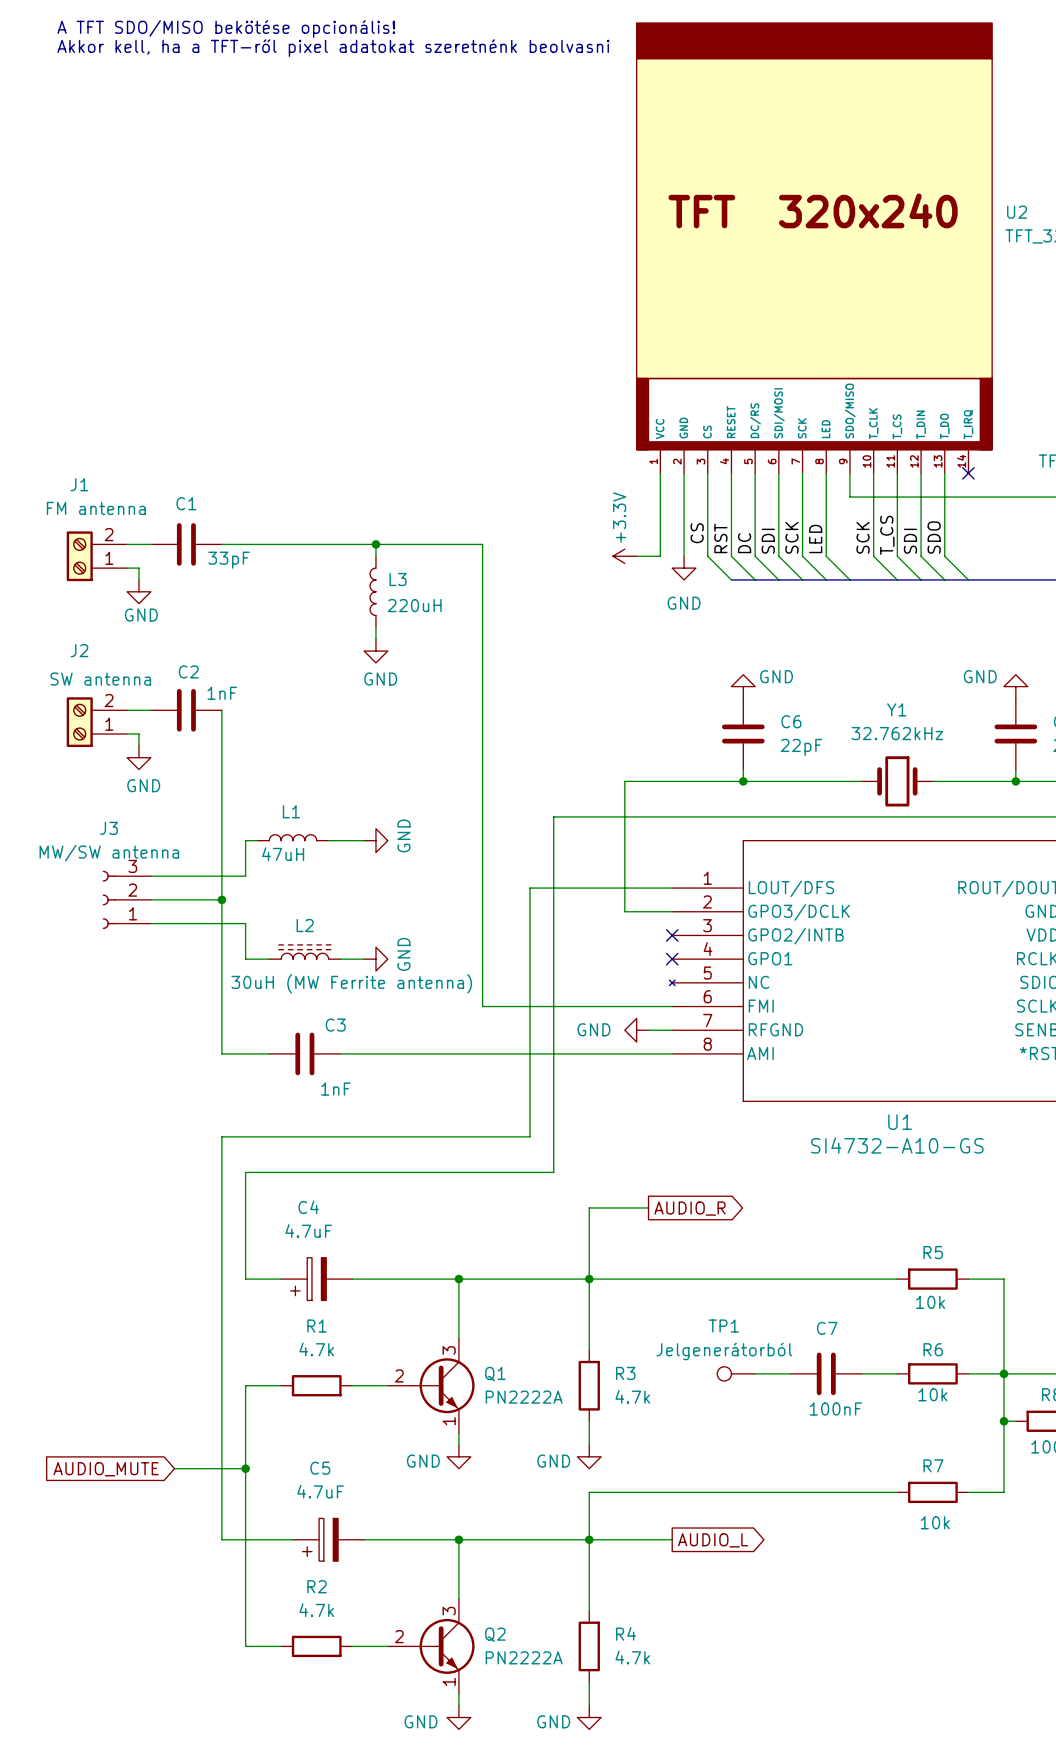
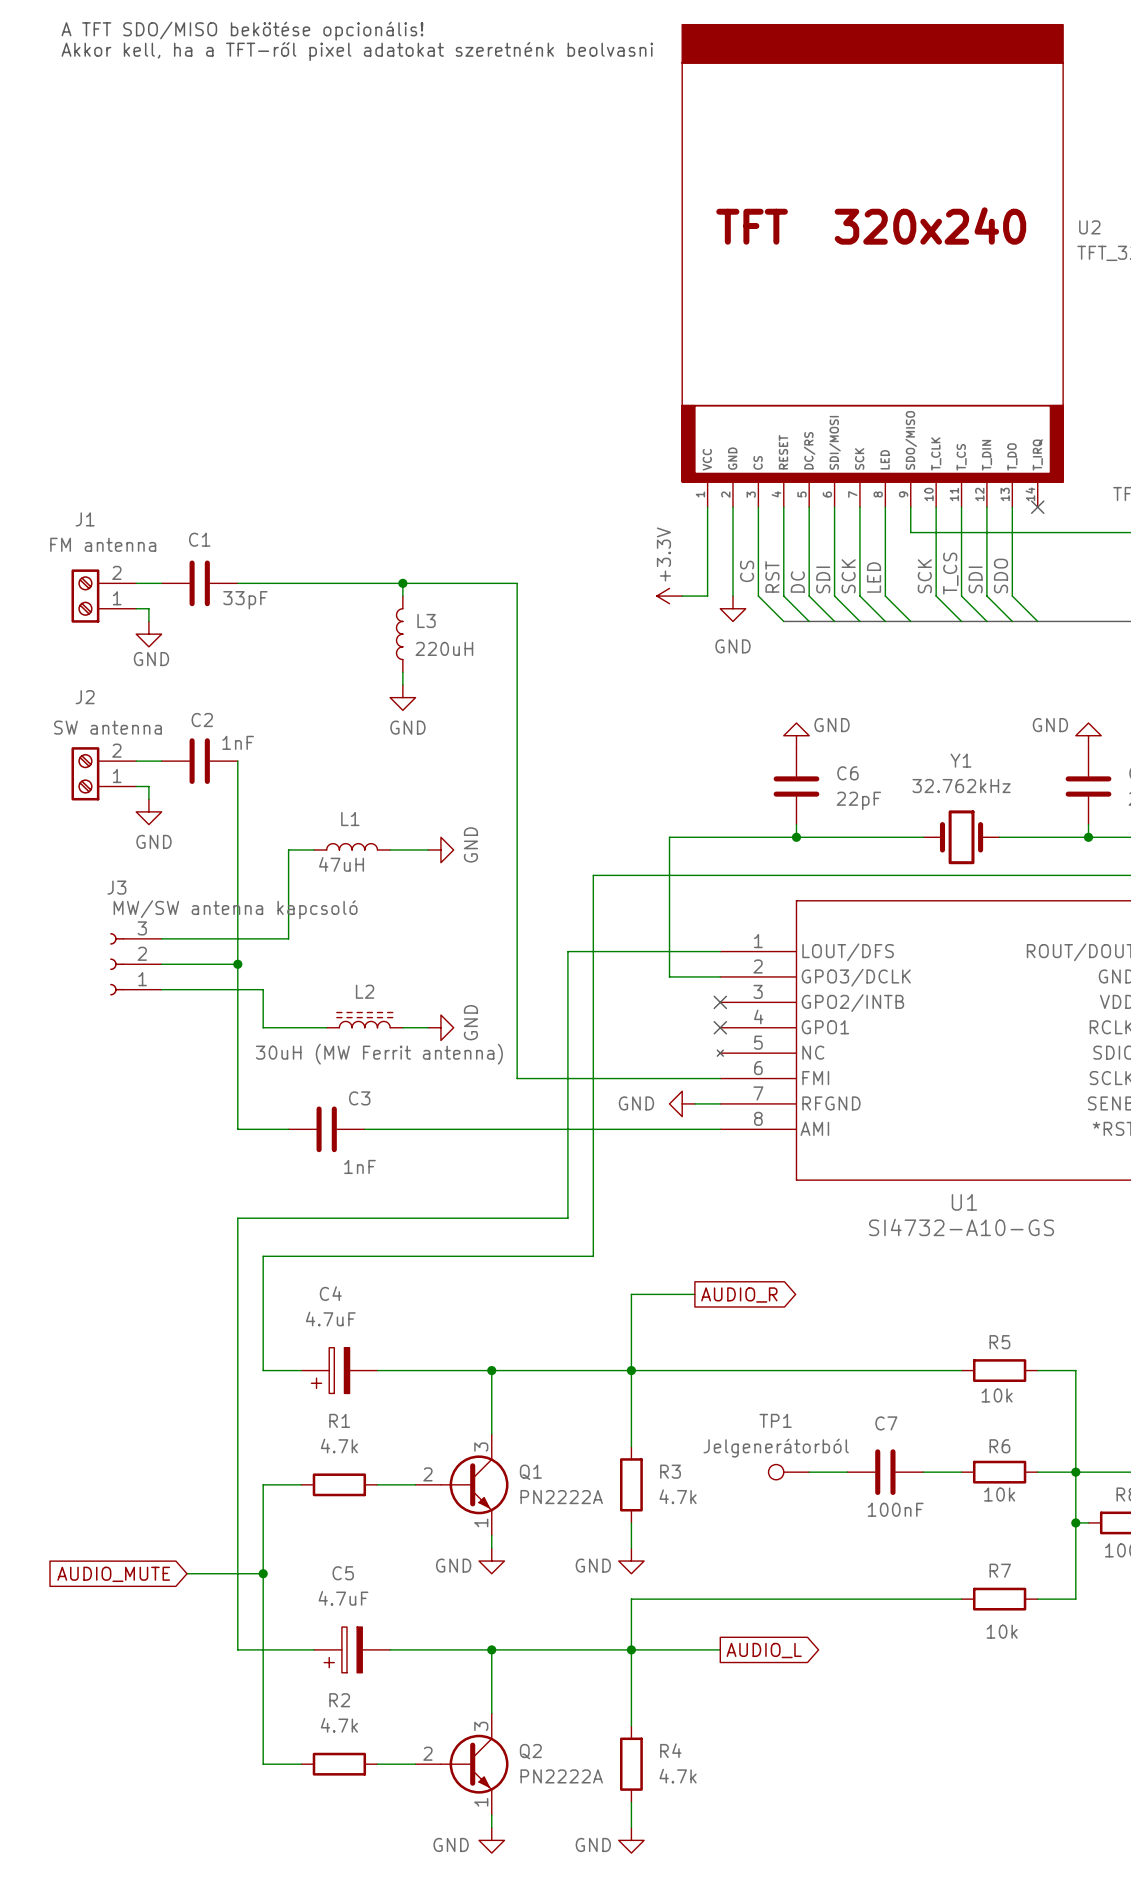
L1 position: (293, 837) -> (352, 846)
wire: (257, 840) (245, 840) (245, 876) -> (313, 849) (288, 849) (288, 938) (263, 938)
wire: (328, 840) (364, 840) -> (390, 849) (428, 849)
power symbol position: GND (375, 840) -> GND (440, 849)
J3 value: MW/SW antenna (109, 853) -> MW/SW antenna kapcsoló (235, 909)
L2 position: (304, 952) -> (364, 1020)
wire: none -> (288, 1027) (326, 1027)
wire: (340, 959) (364, 959) -> (402, 1027) (428, 1027)
power symbol position: GND (375, 959) -> GND (440, 1027)
L2 value: 30uH (MW Ferrite antenna) (351, 983) -> 30uH (MW Ferrit antenna) (379, 1054)

